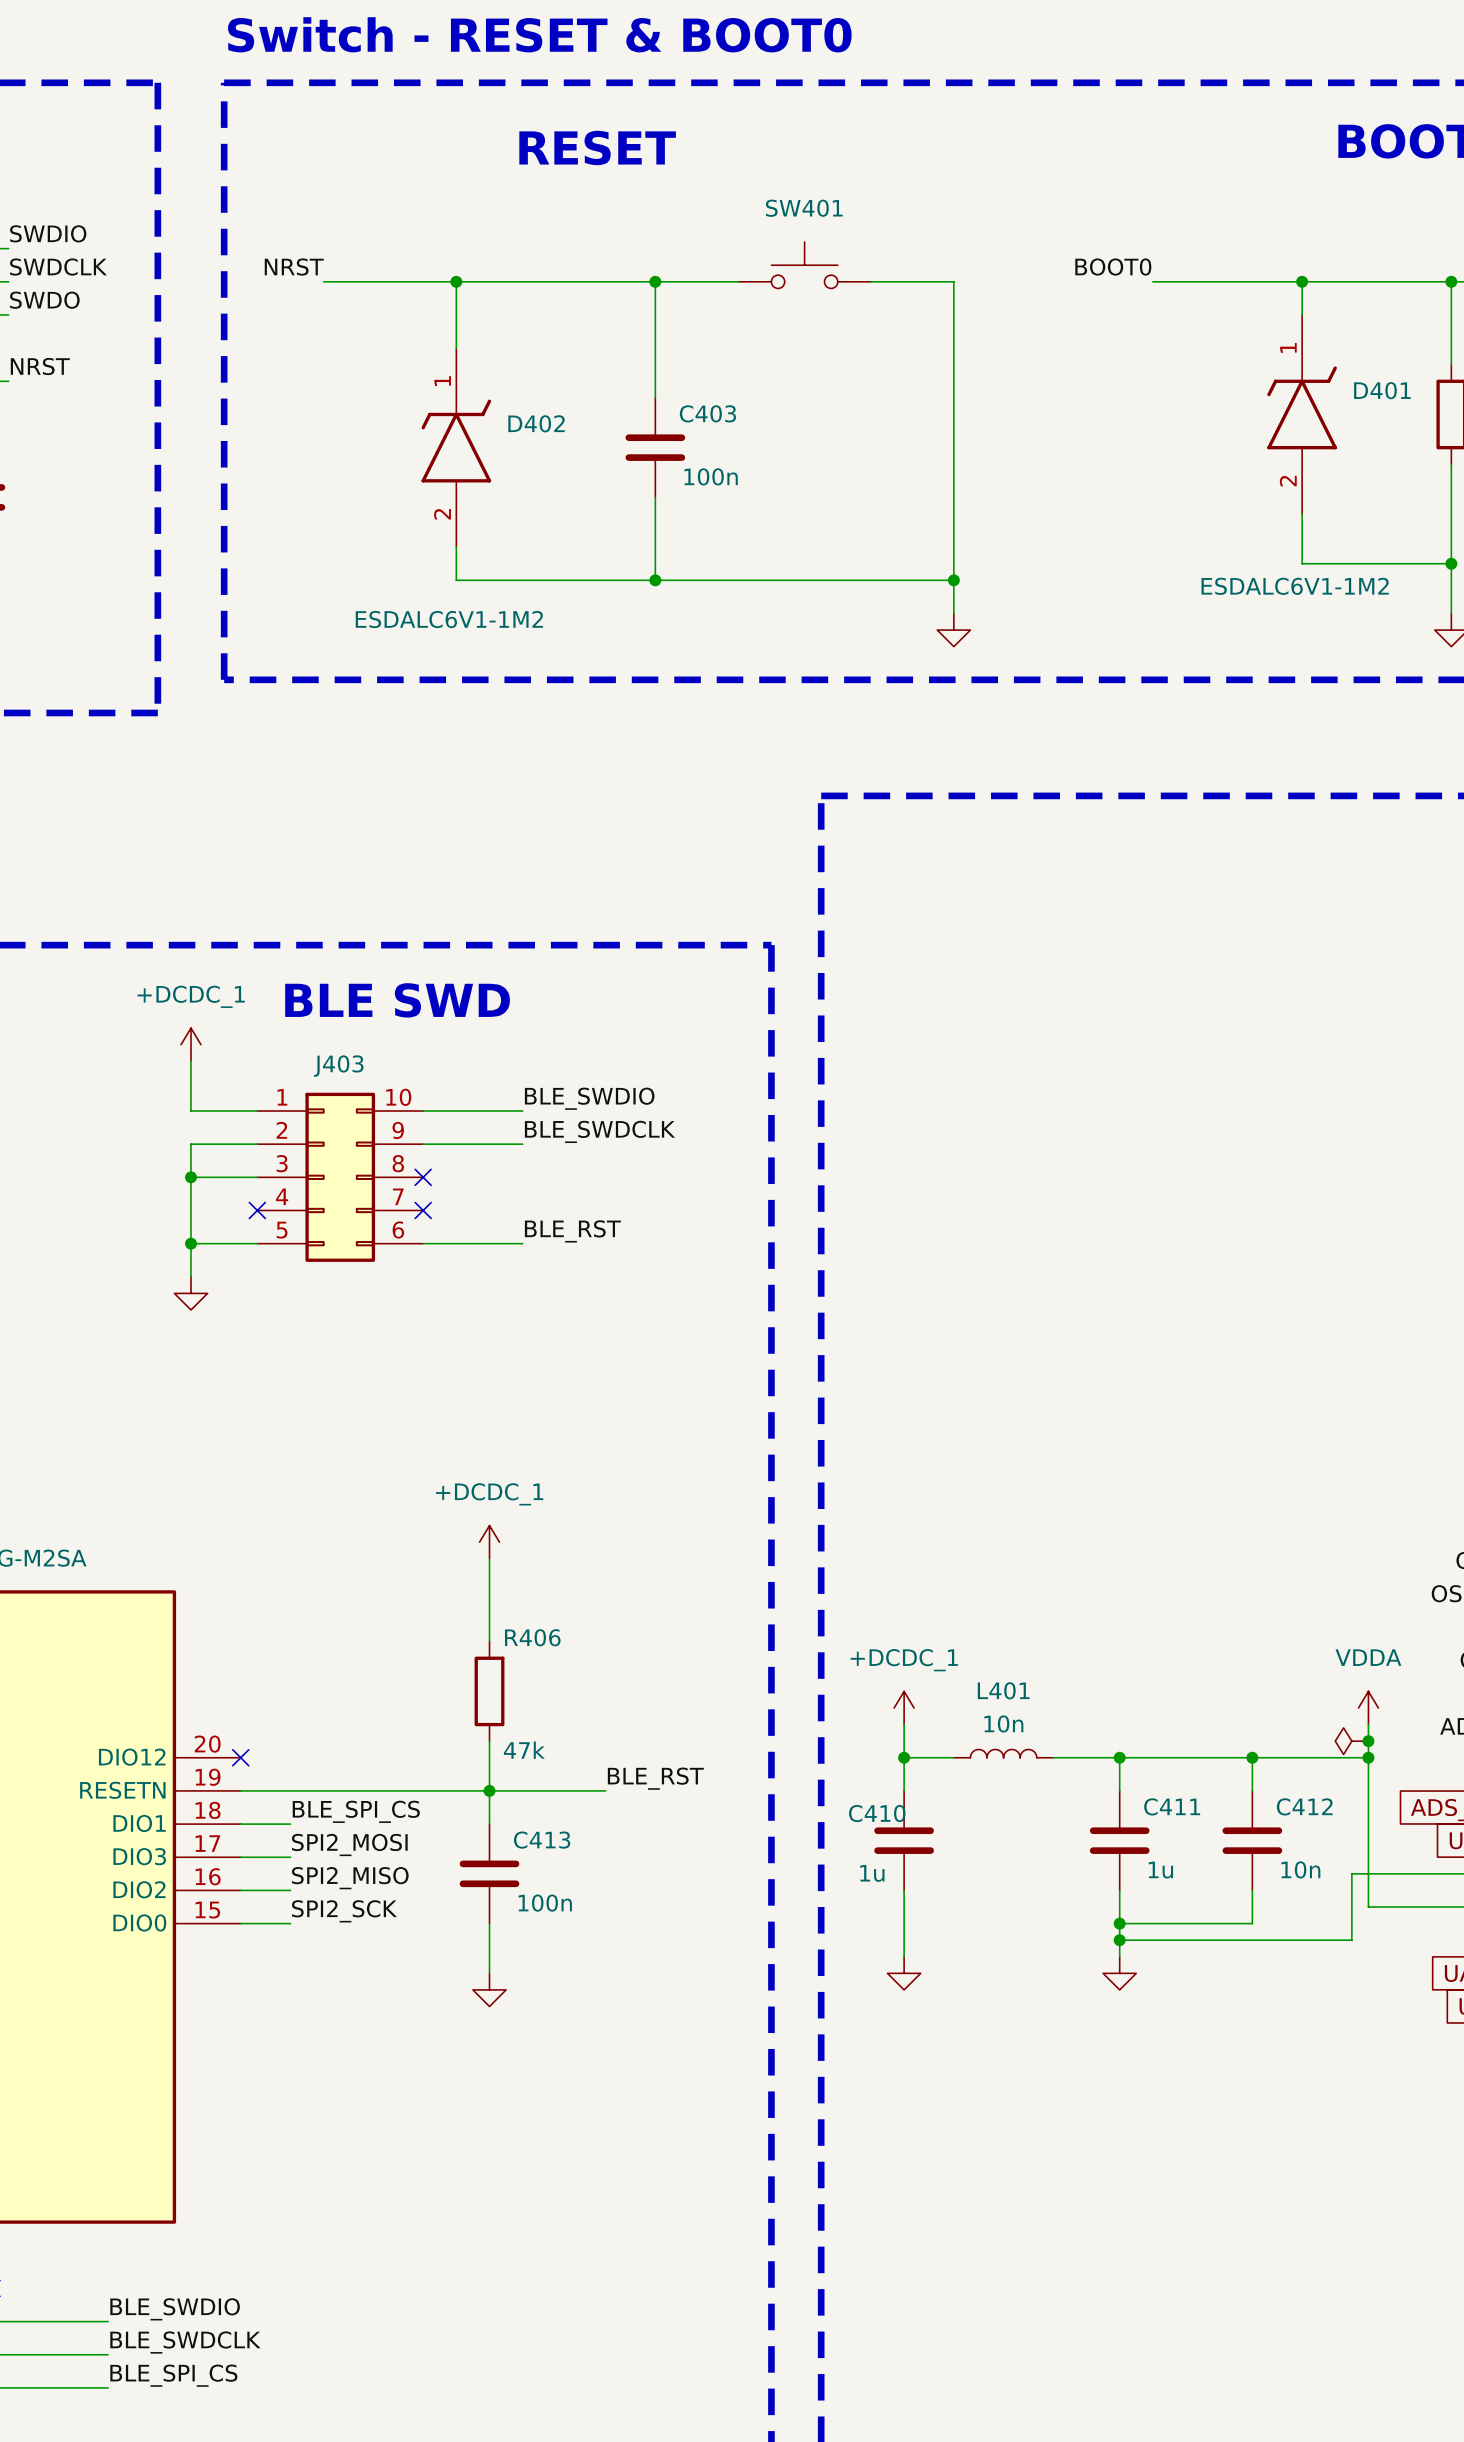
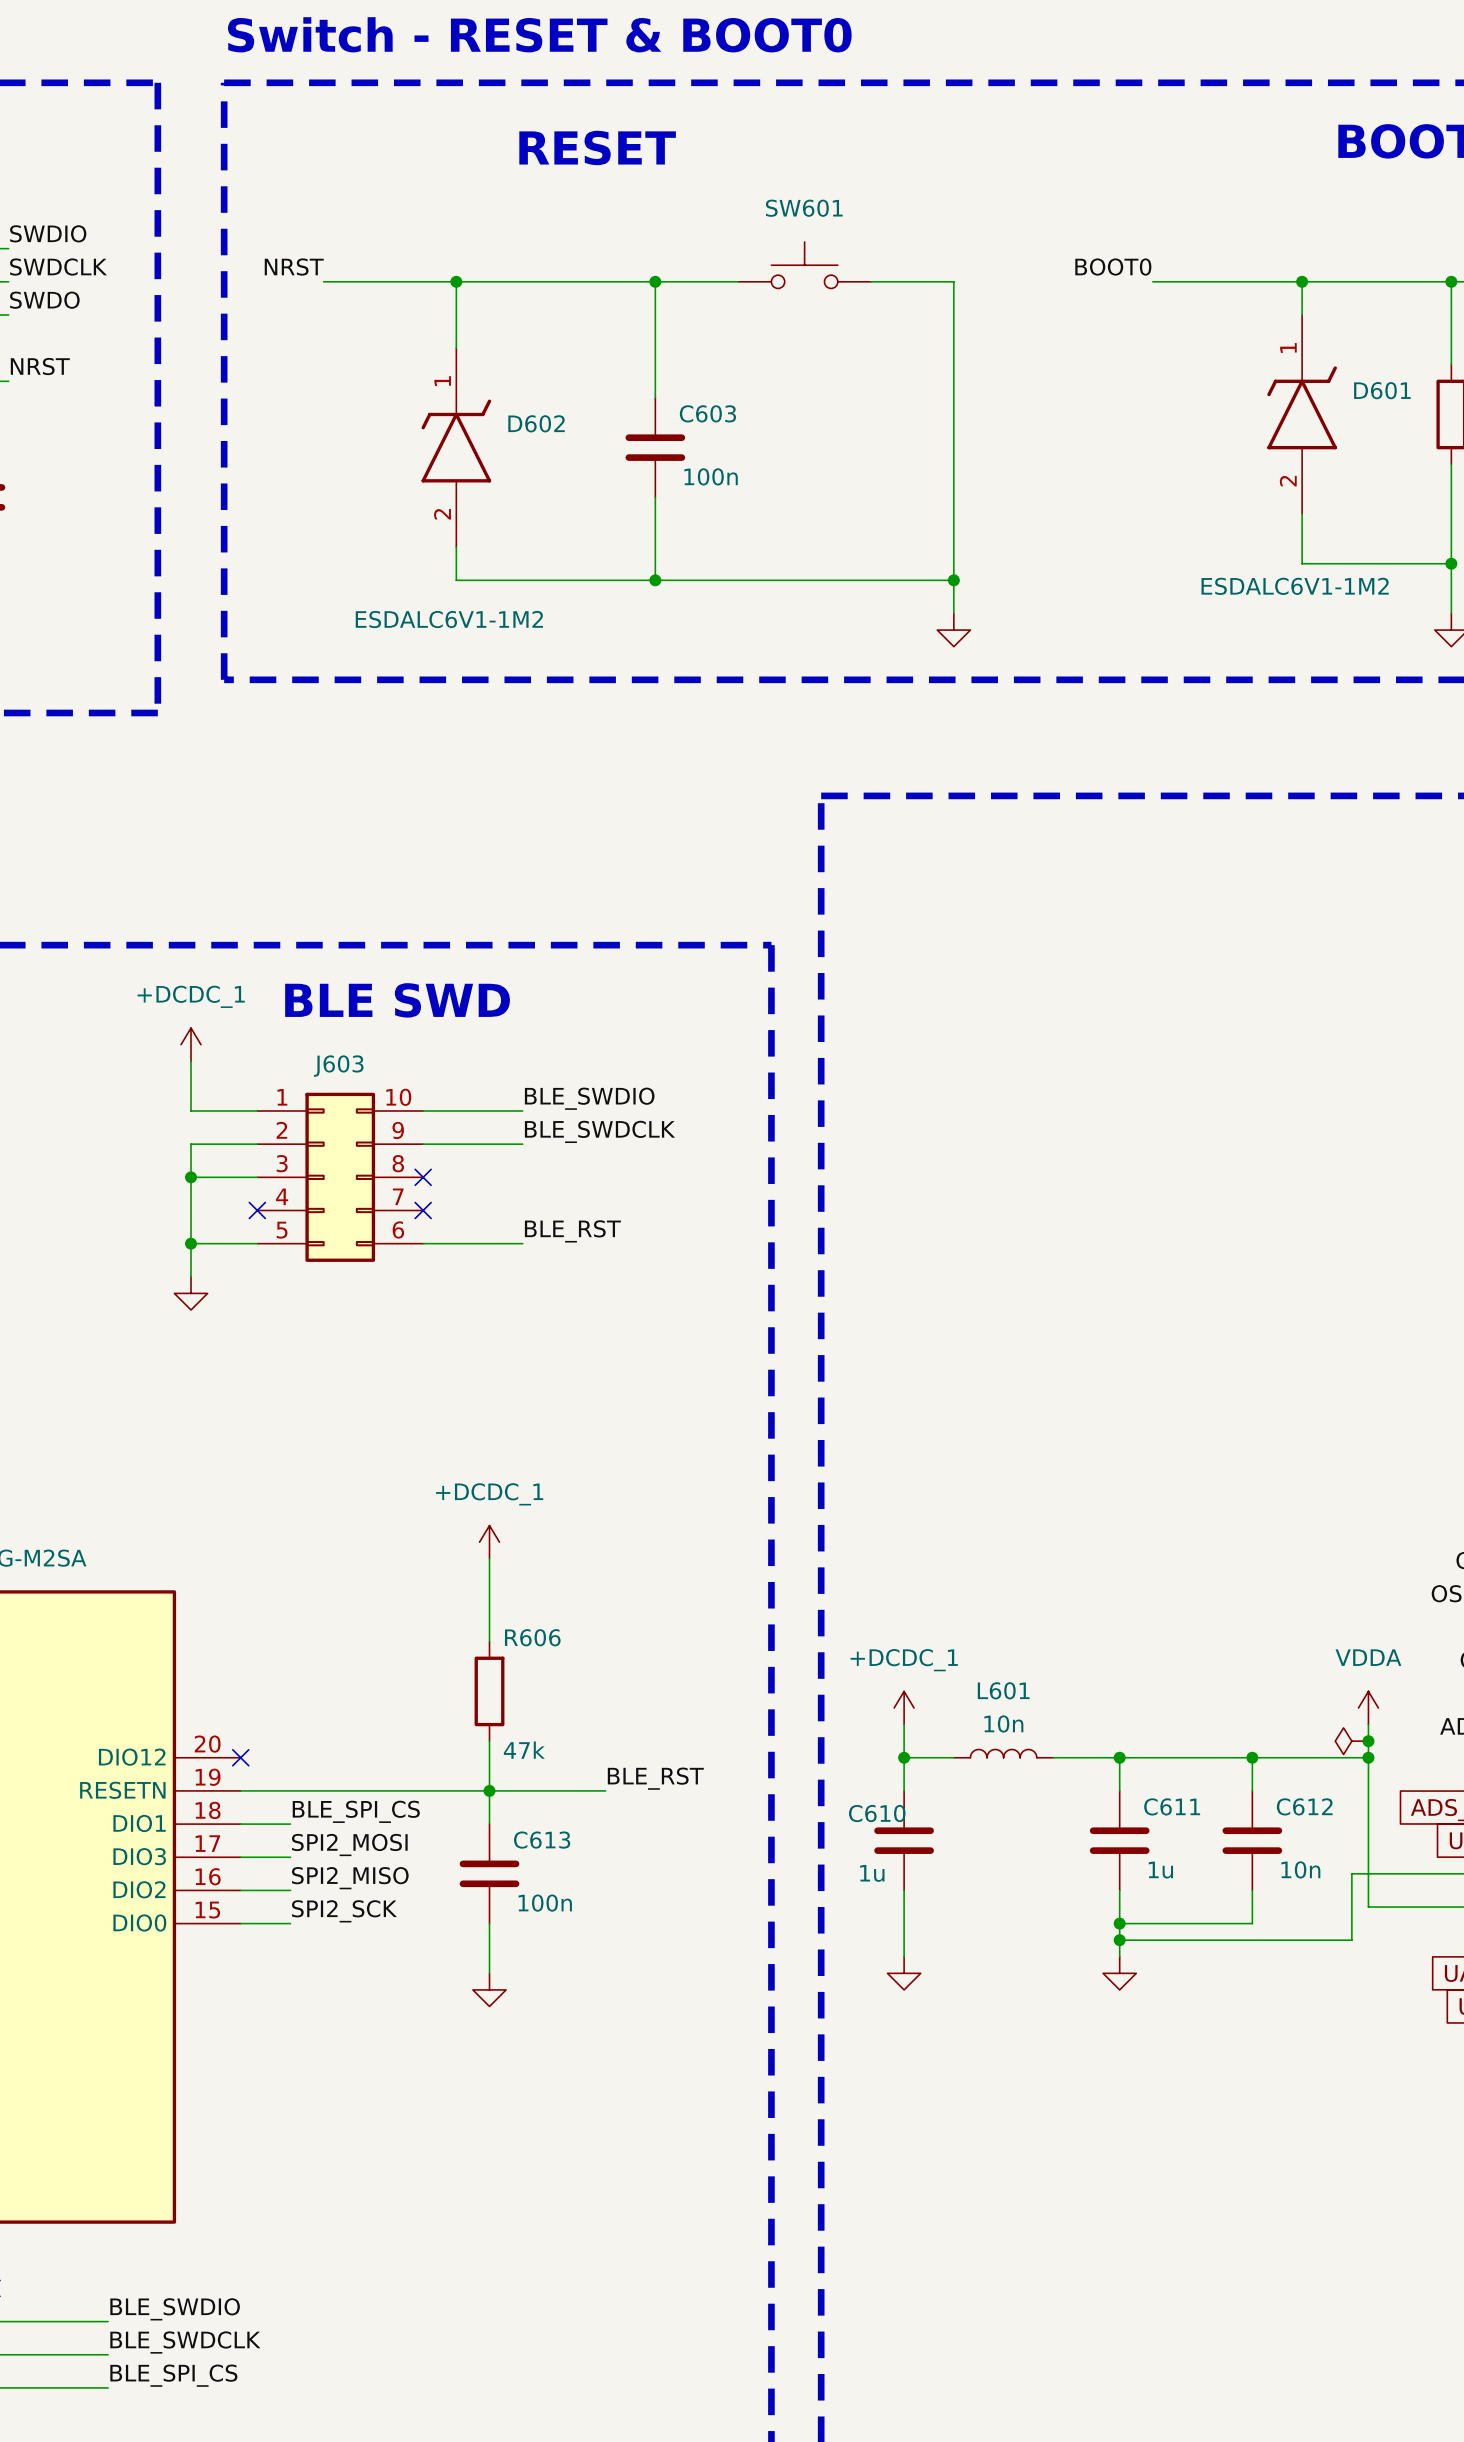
SW401 name: SW401 (804, 208) -> SW601 (804, 208)
D401 name: D401 (1382, 390) -> D601 (1382, 390)
C403 name: C403 (707, 413) -> C603 (707, 413)
D402 name: D402 (536, 423) -> D602 (536, 423)
J403 name: J403 (338, 1066) -> J603 (338, 1066)
R406 name: R406 (532, 1637) -> R606 (532, 1637)
L401 name: L401 (1003, 1690) -> L601 (1003, 1690)
C411 name: C411 (1172, 1806) -> C611 (1172, 1806)
C412 name: C412 (1304, 1806) -> C612 (1304, 1806)
C410 name: C410 (877, 1813) -> C610 (877, 1813)
C413 name: C413 (542, 1840) -> C613 (542, 1840)

